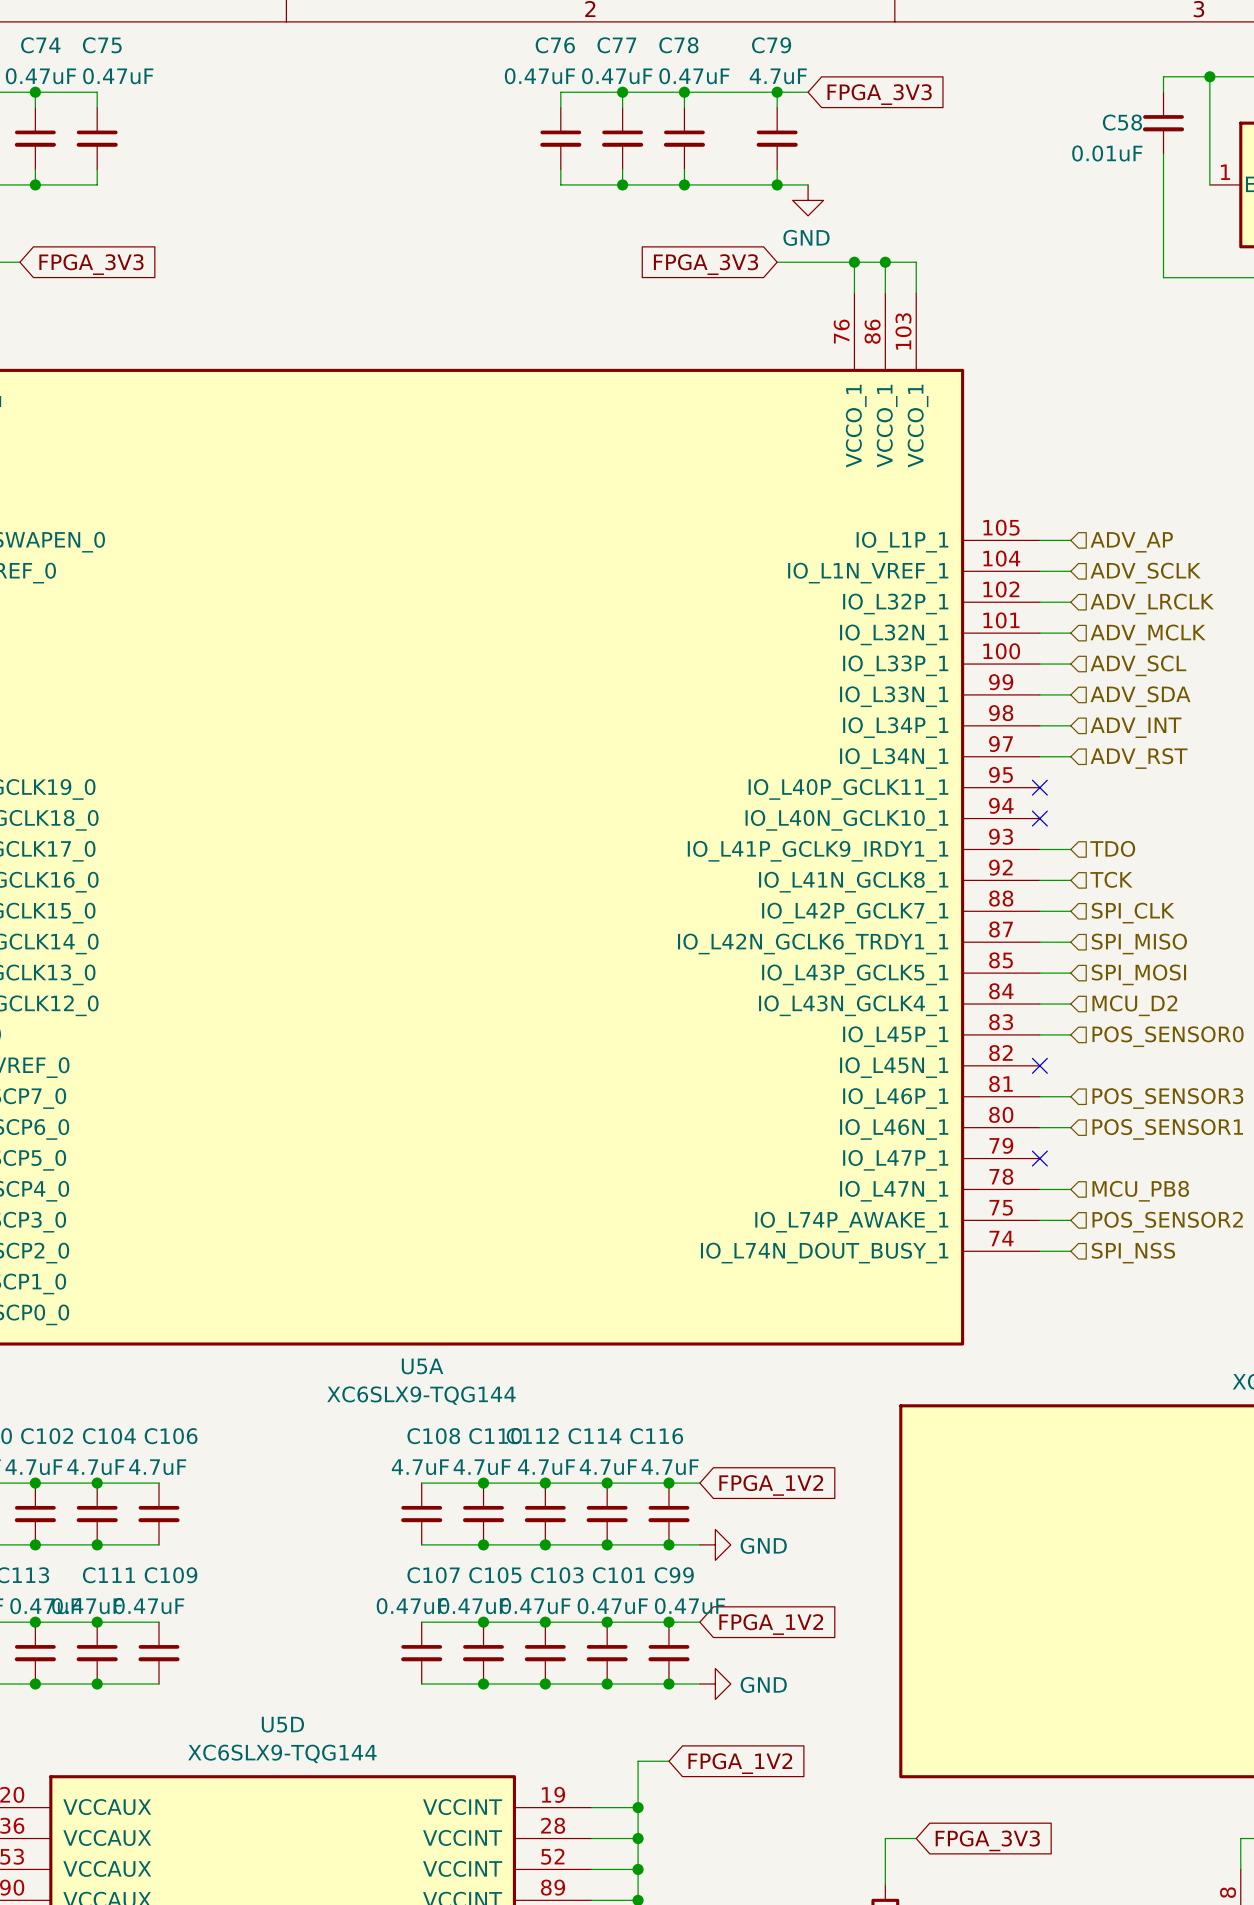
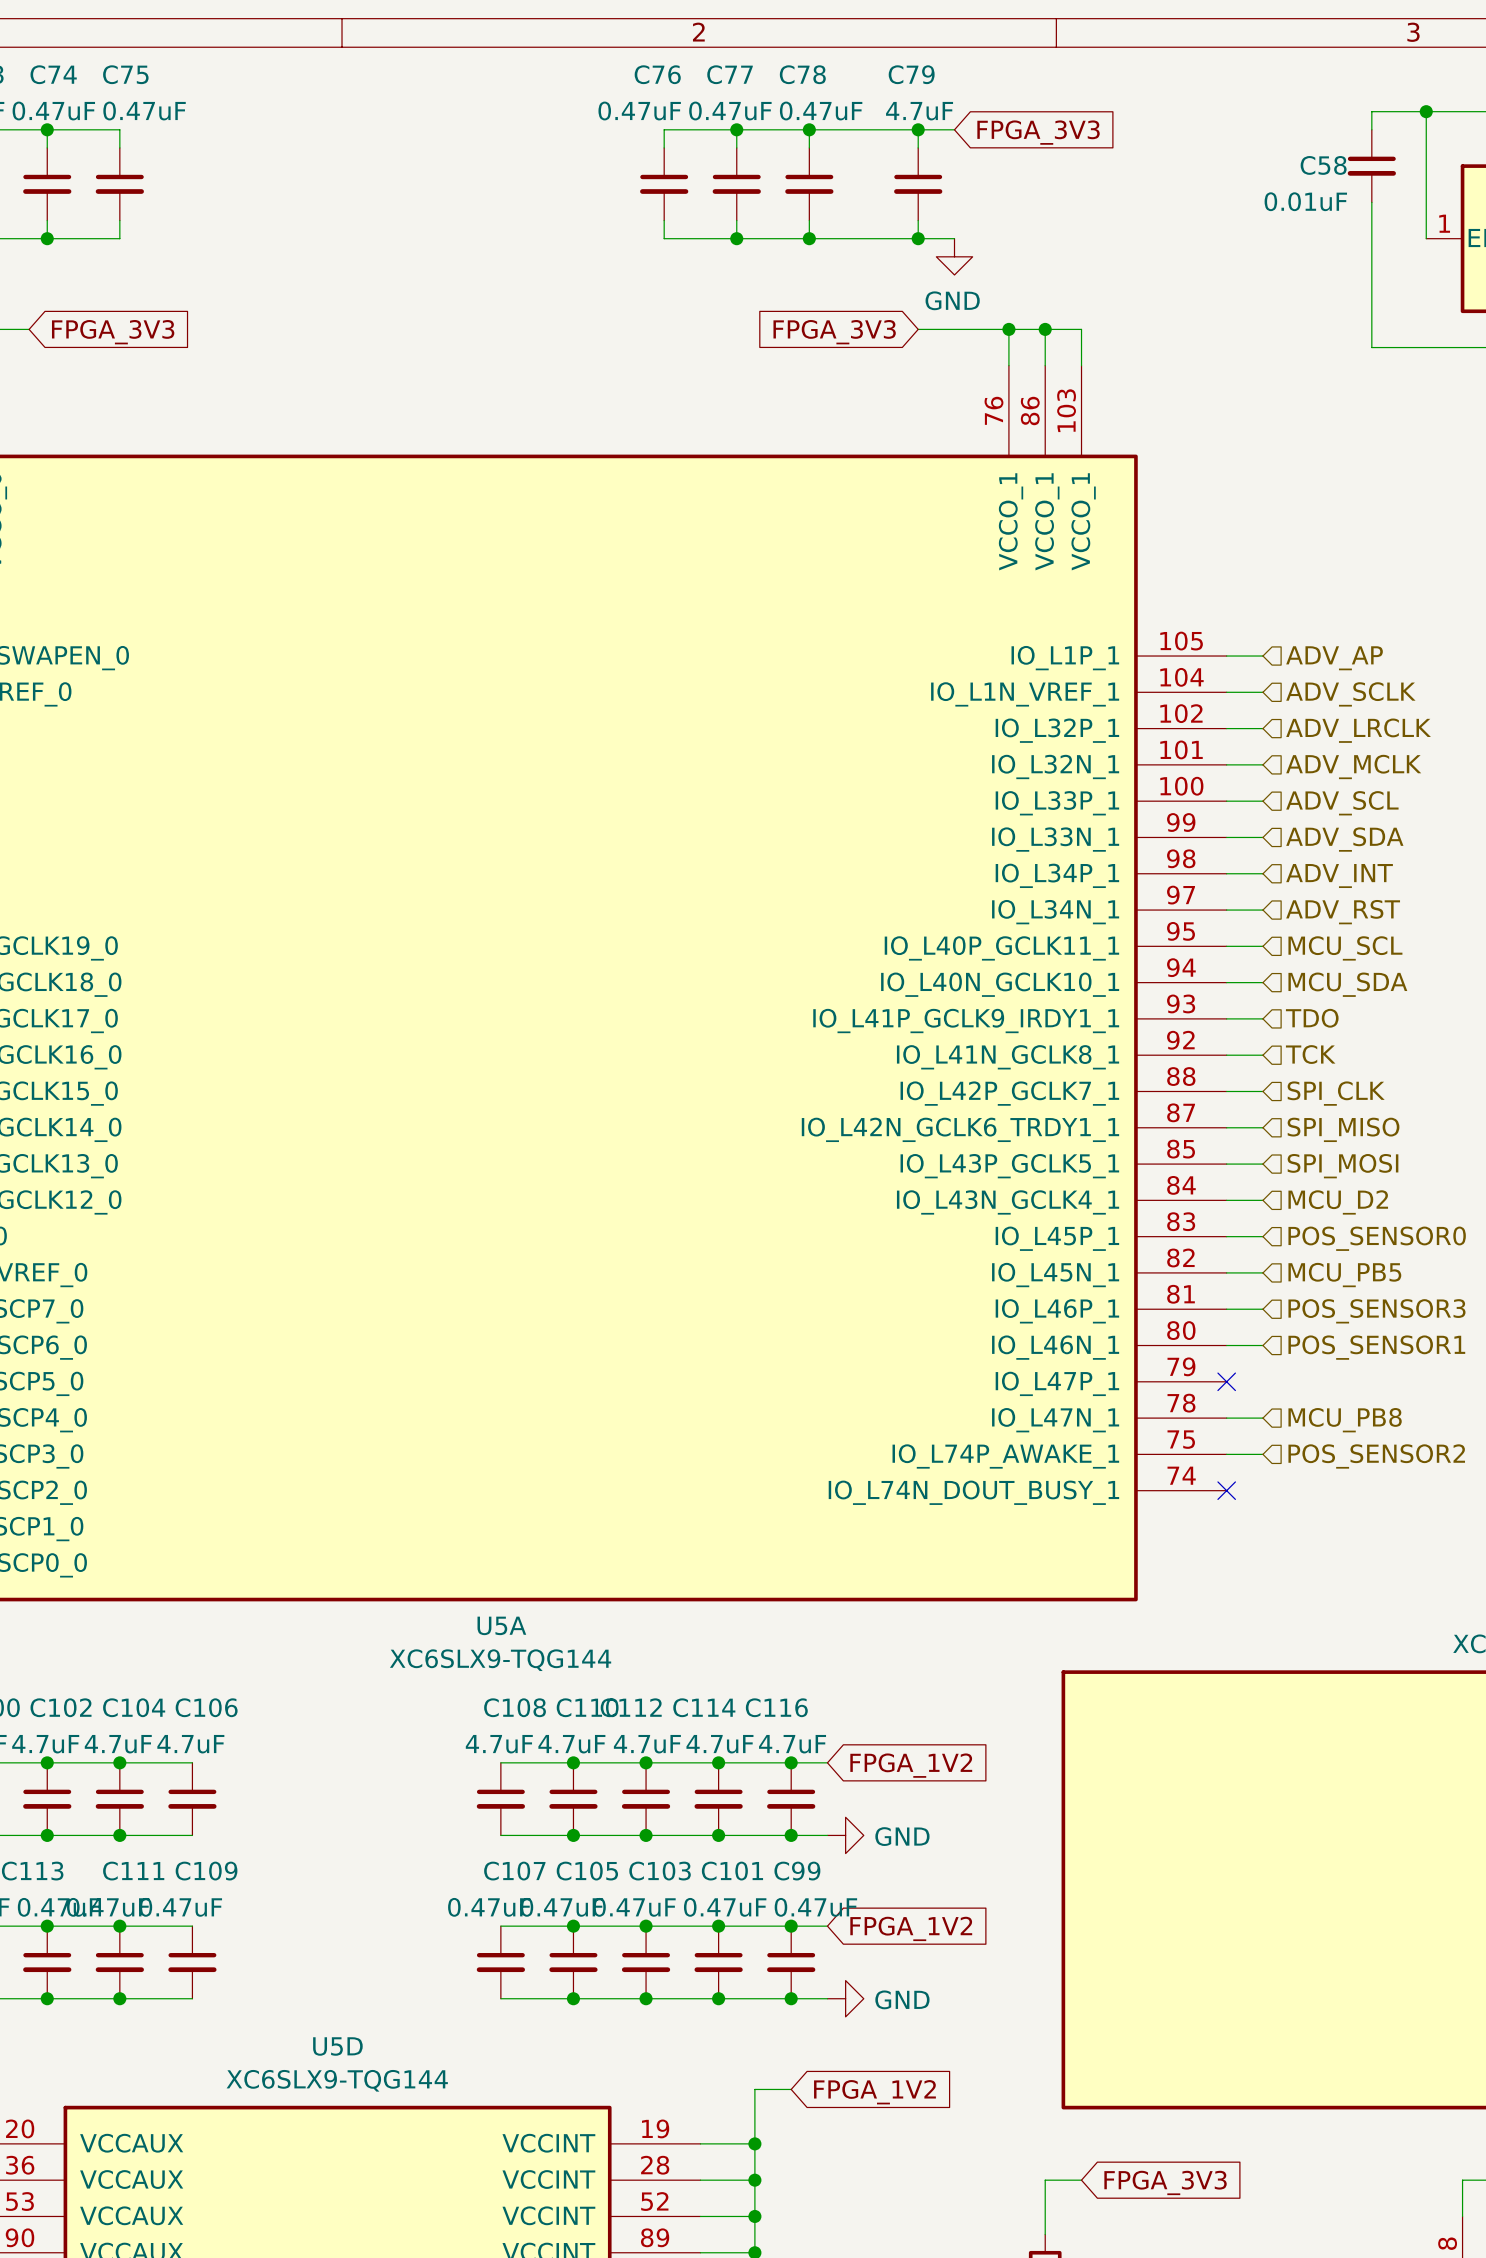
wire: none -> (1226, 946) (1262, 946)
no-connect mark: (1039, 787) -> none
hierarchical label: none -> MCU_SCL (1345, 948)
wire: none -> (1226, 982) (1262, 982)
no-connect mark: (1039, 818) -> none
hierarchical label: none -> MCU_SDA (1347, 984)
no-connect mark: (1039, 1065) -> none
hierarchical label: none -> MCU_PB5 (1344, 1275)
wire: (1039, 1251) (1070, 1251) -> (1226, 1272) (1262, 1272)
no-connect mark: none -> (1226, 1490)
hierarchical label: SPI_NSS (1133, 1253) -> none

